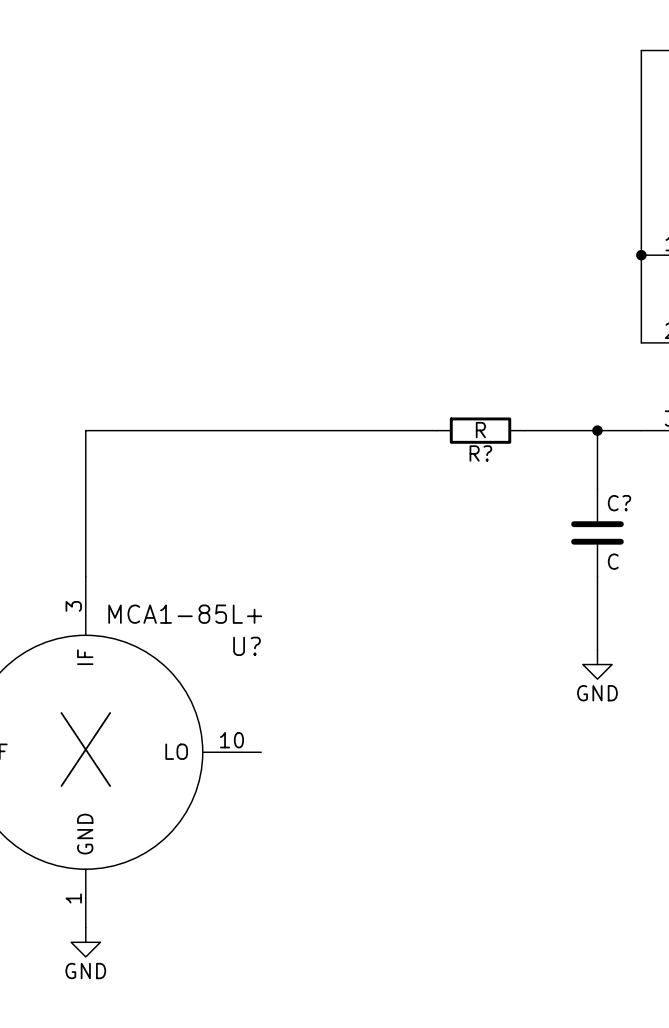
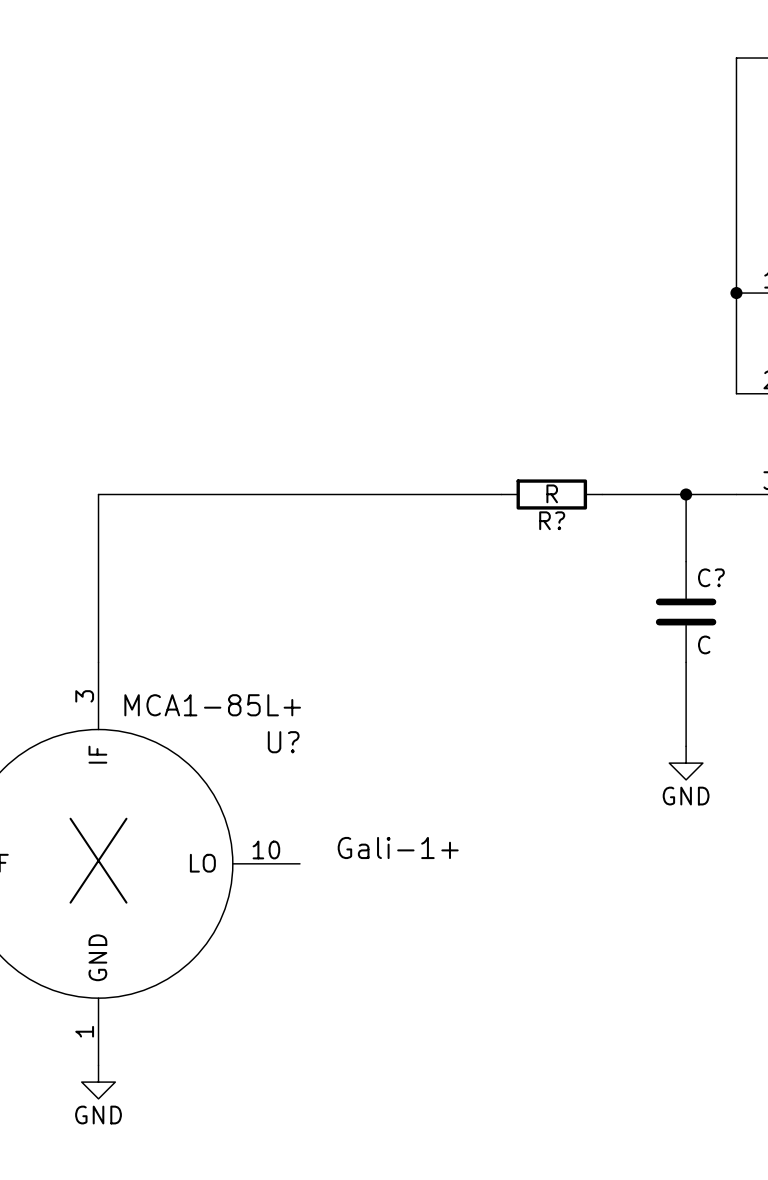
text: none -> Gali-1+ (398, 847)

